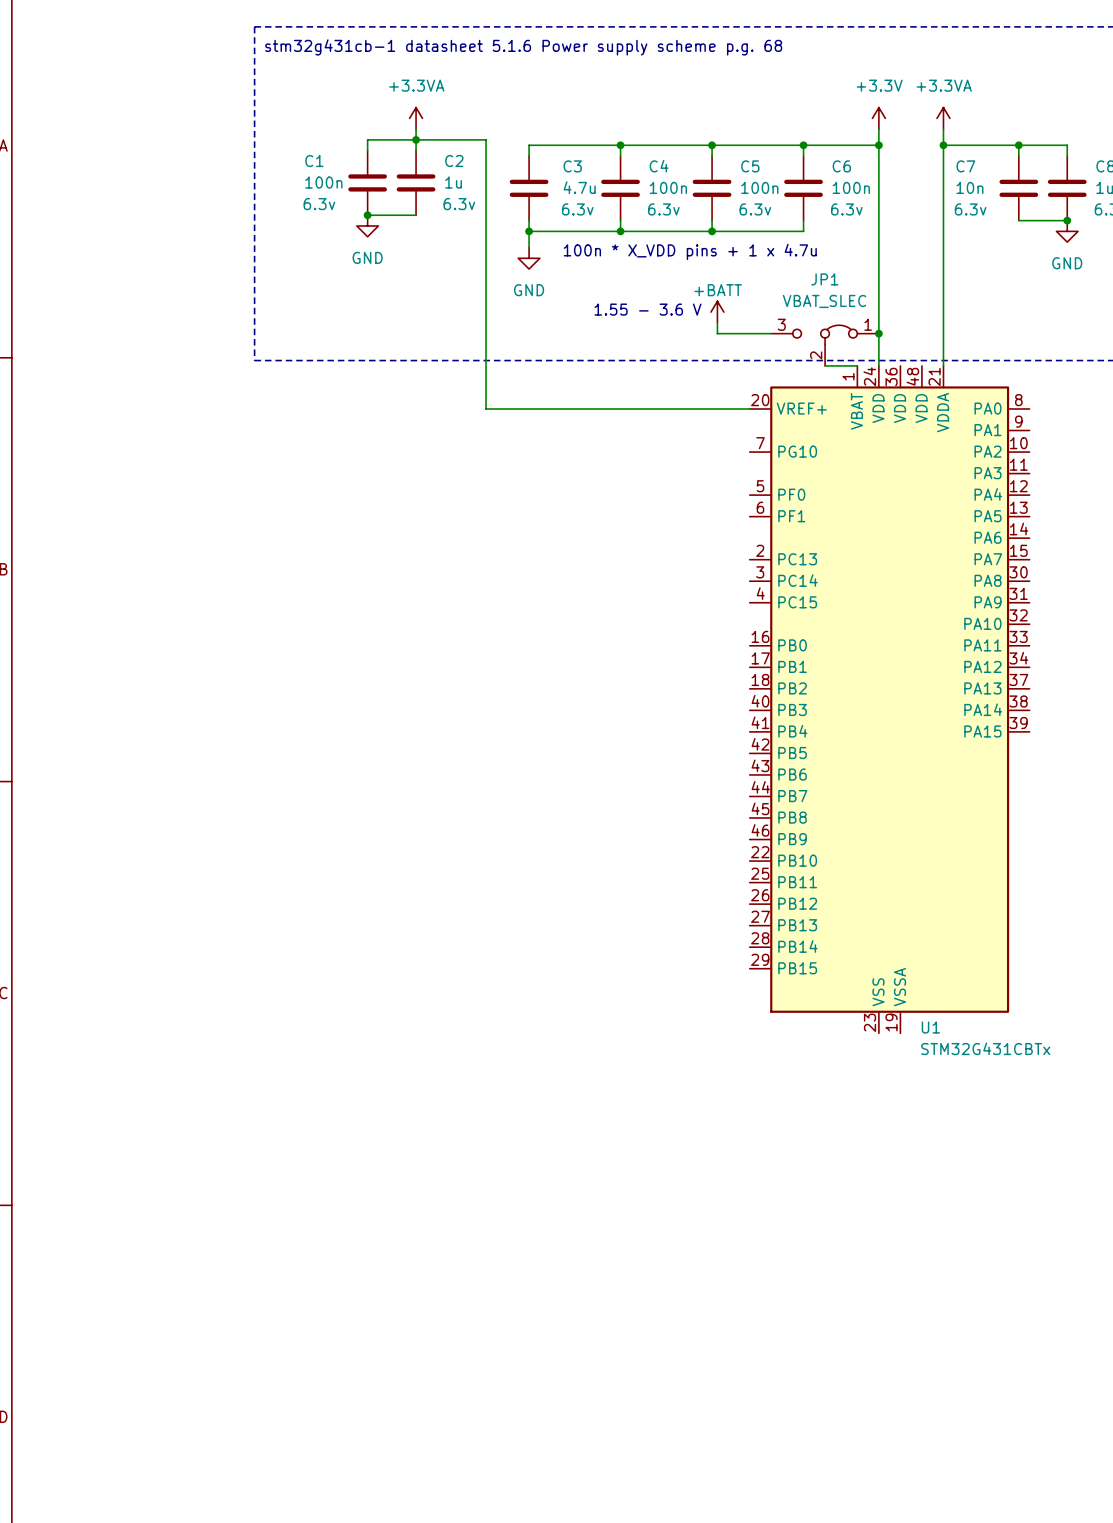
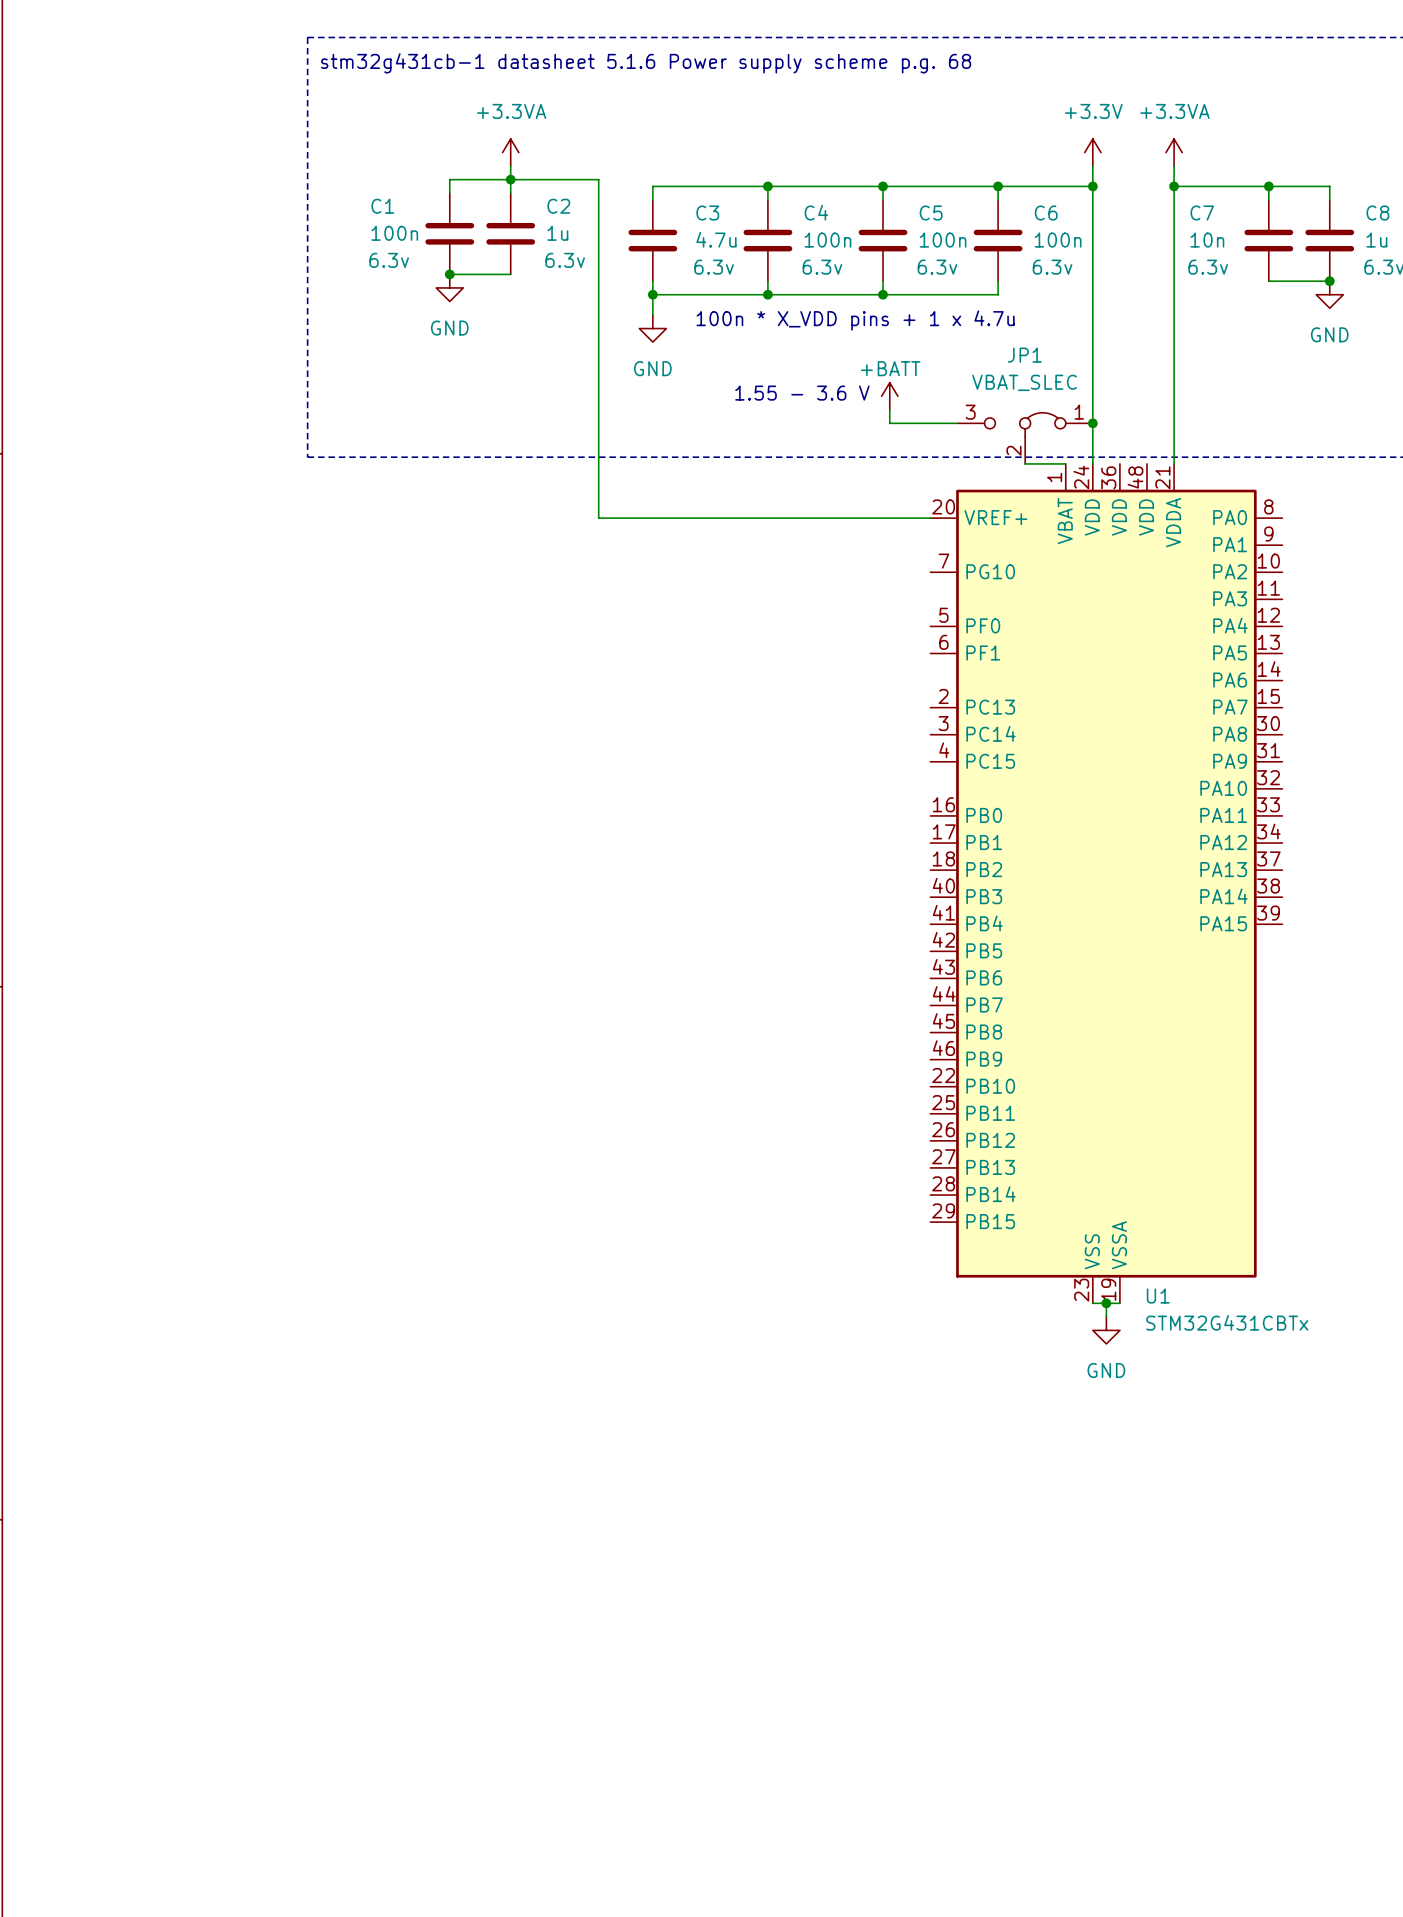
wire: none -> (1092, 1303) (1119, 1303)
wire: none -> (1106, 1303) (1106, 1316)
junction: none -> (1106, 1303)
power symbol: none -> GND (1106, 1330)

